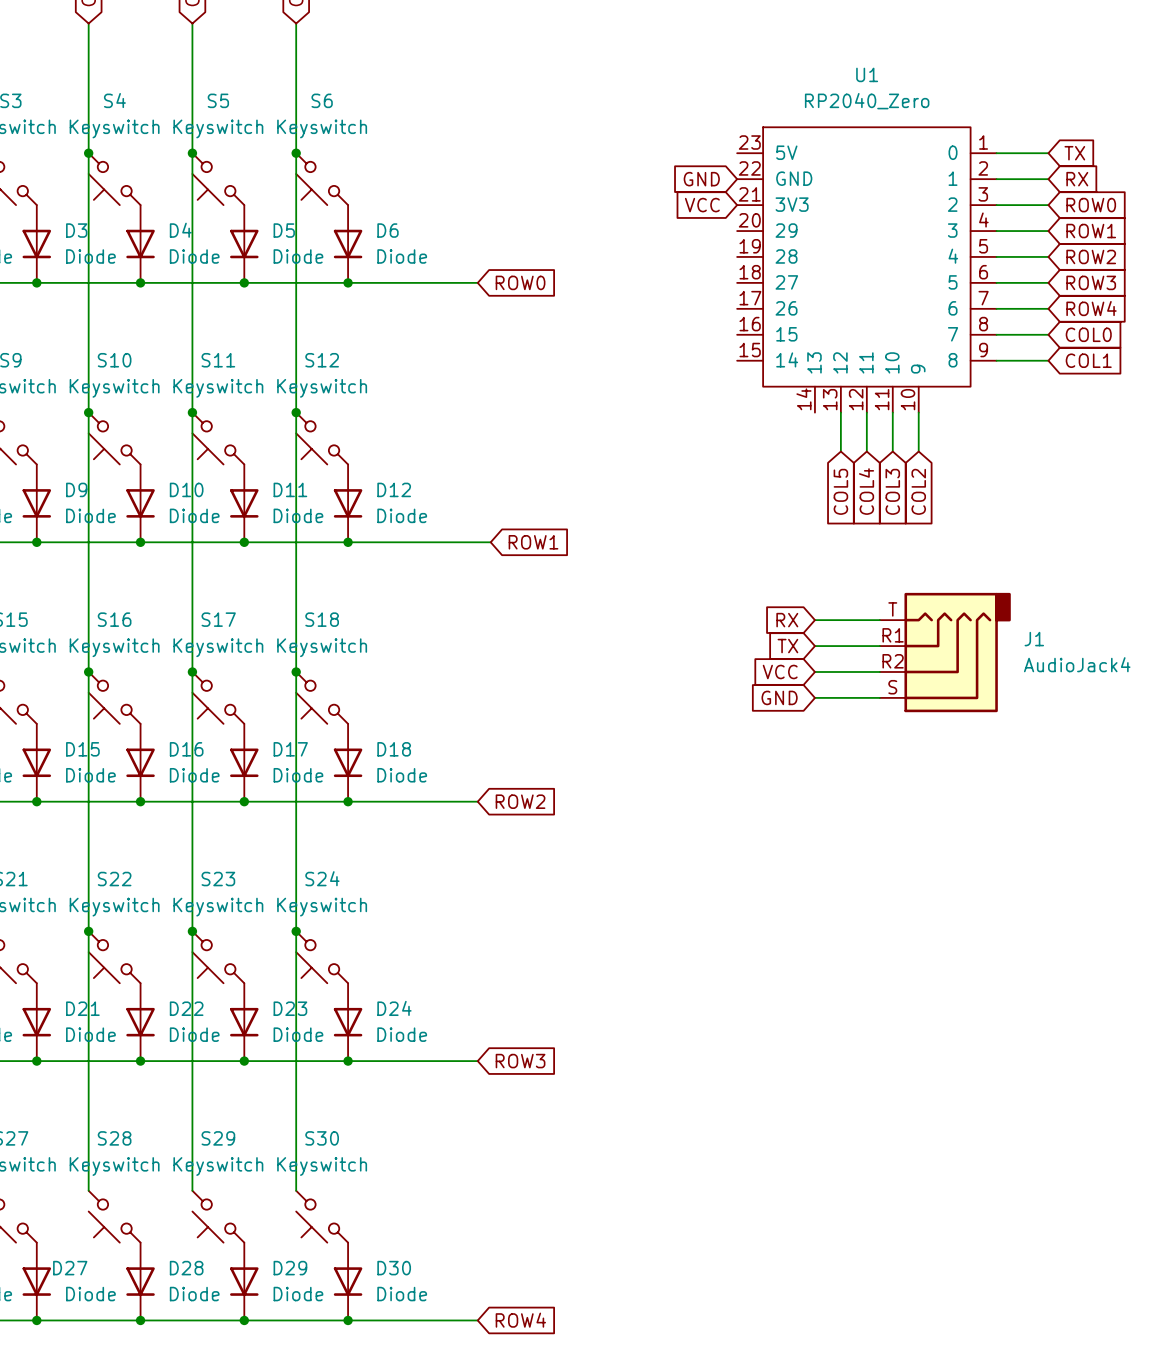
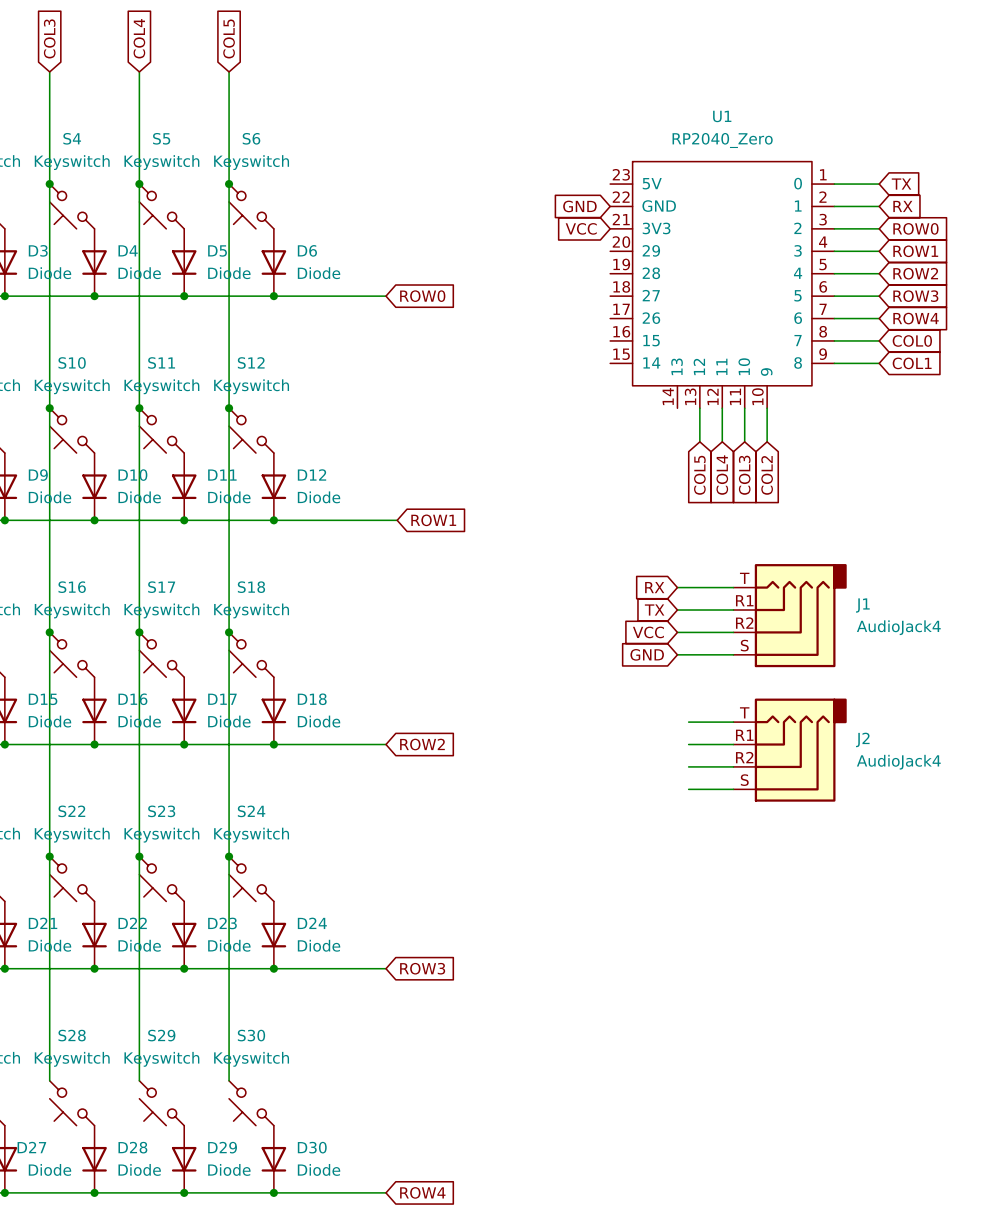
wire: none -> (688, 722) (733, 722)
wire: none -> (688, 744) (733, 744)
J2: none -> AudioJack4 (790, 750)
wire: none -> (688, 766) (733, 766)
wire: none -> (688, 789) (733, 789)

